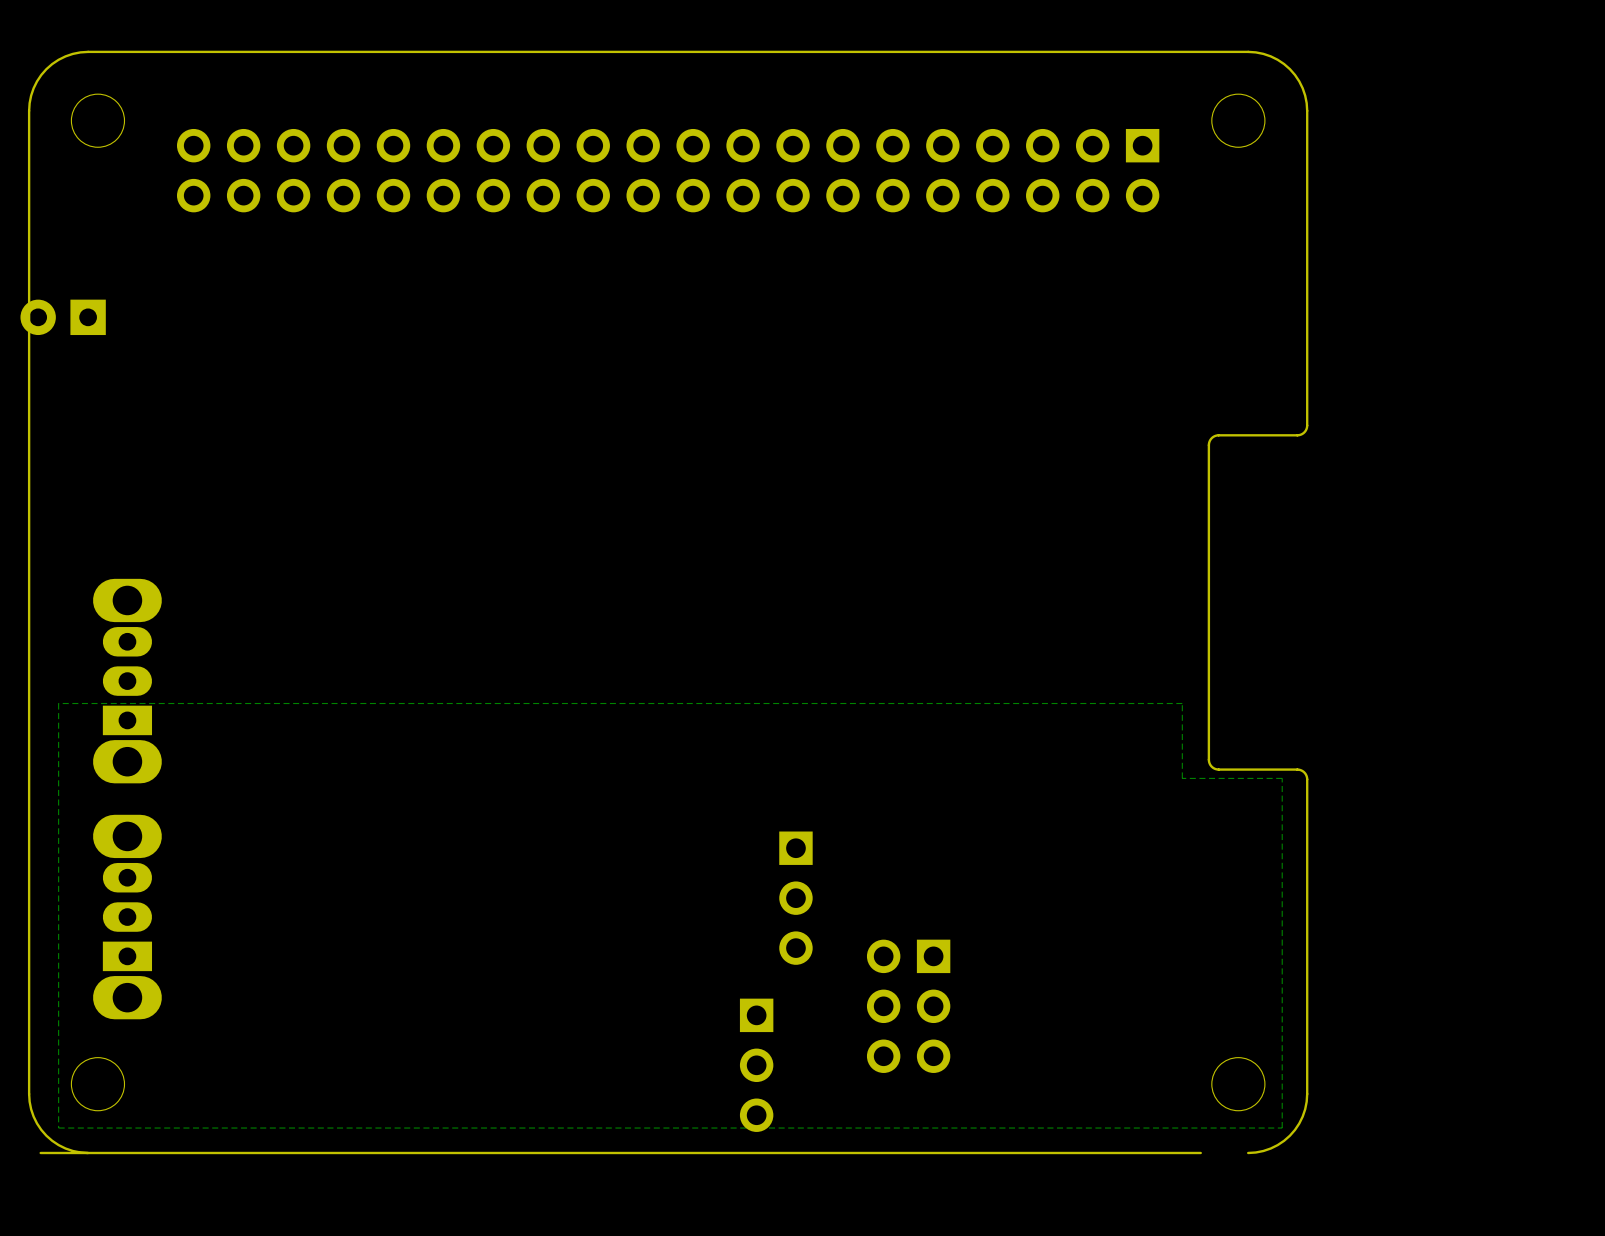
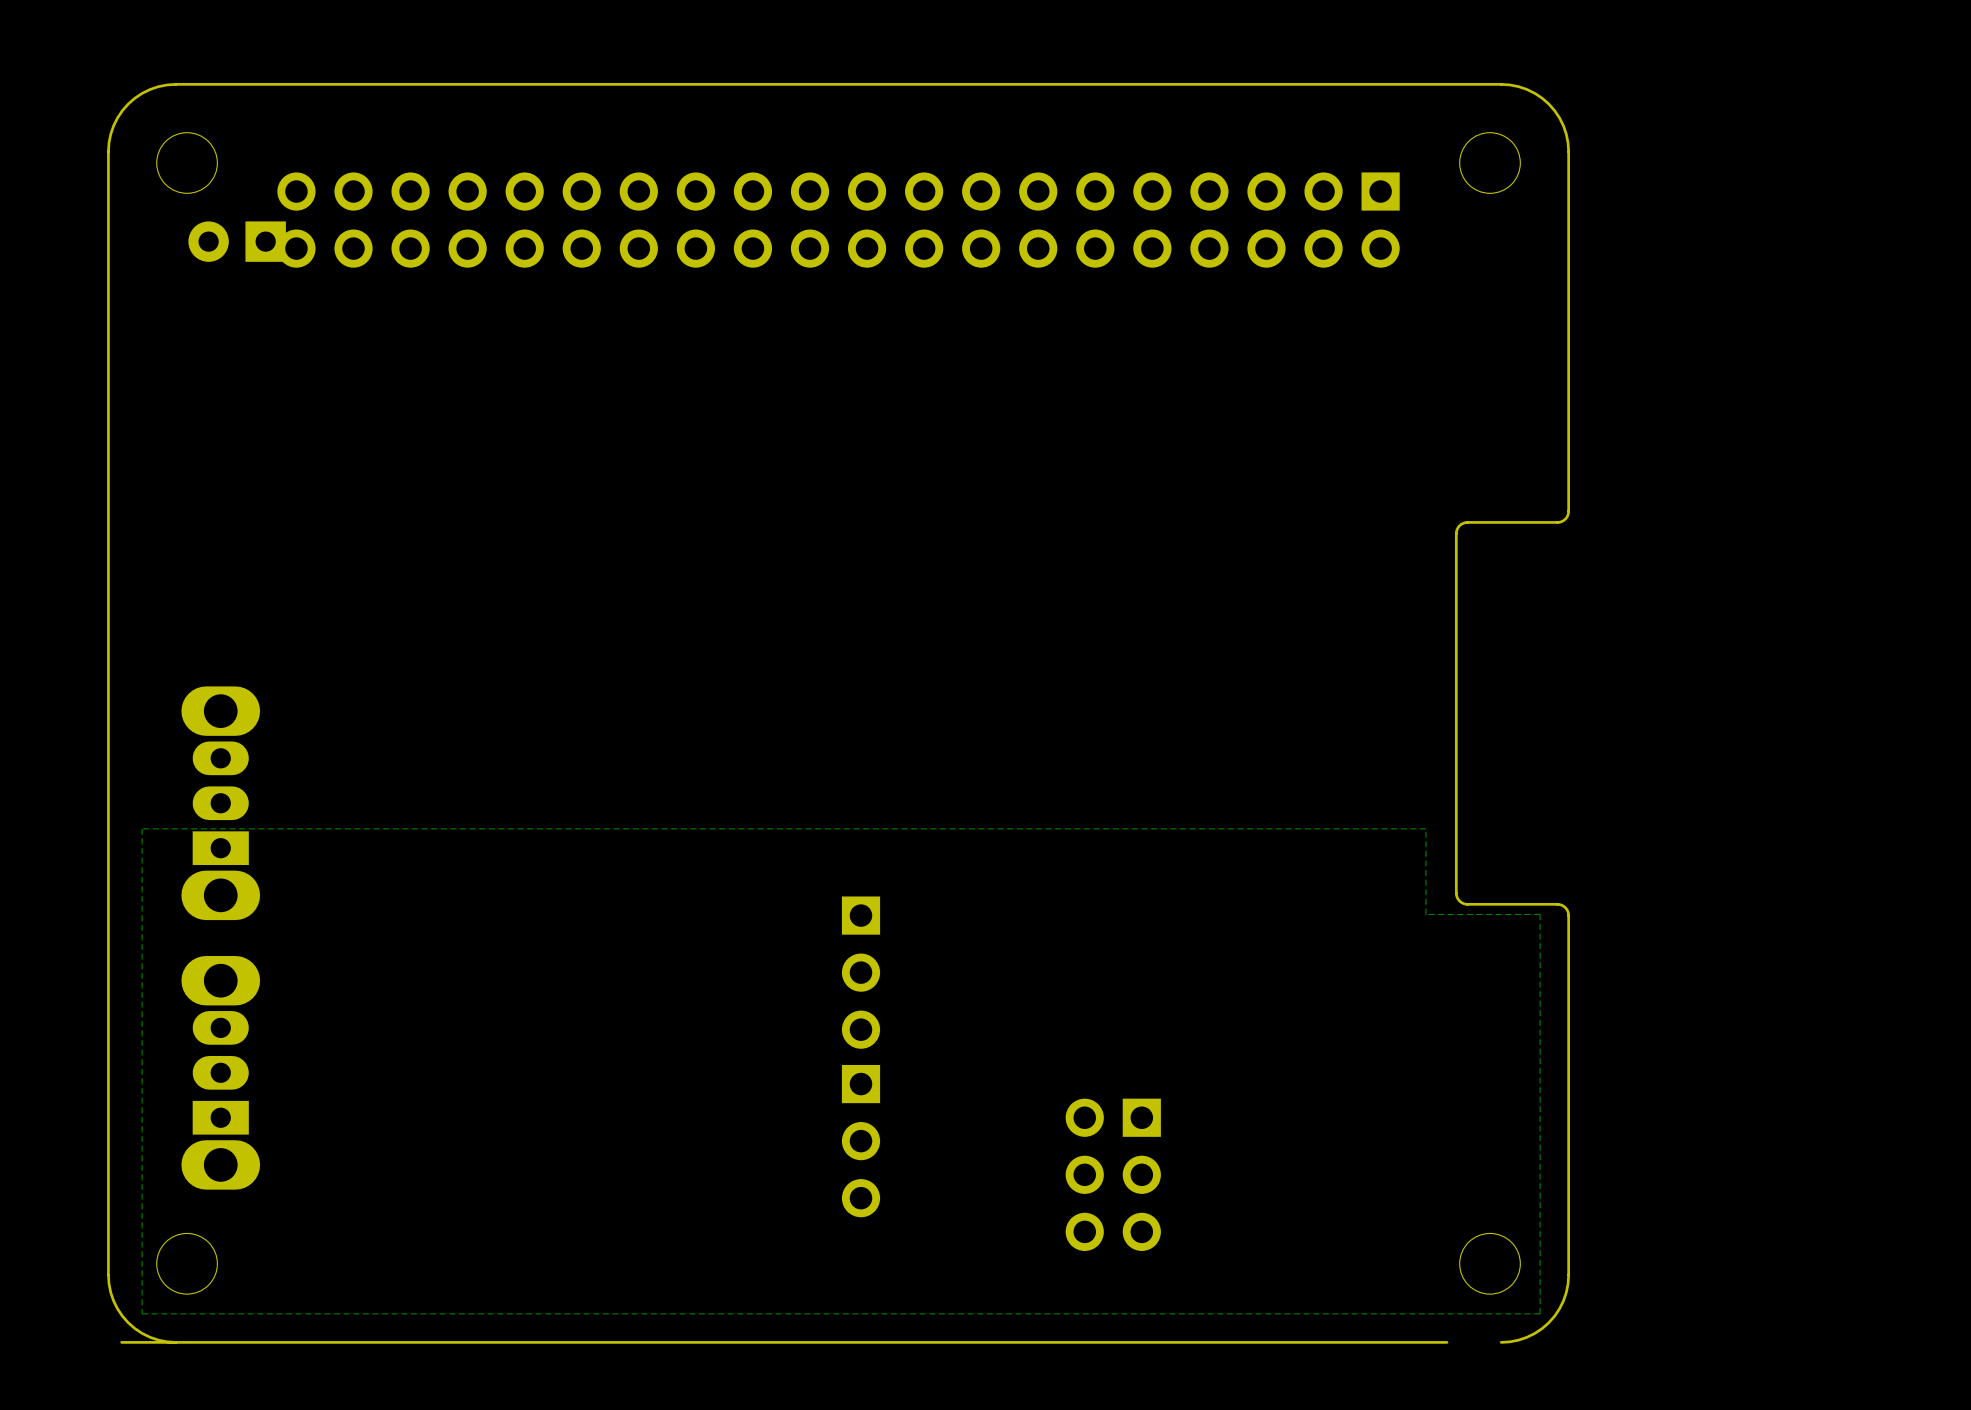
part position: (63, 317) -> (237, 241)
part: none -> (861, 972)
part: (795, 898) -> none
part: none -> (861, 1141)
part: (756, 1065) -> none

